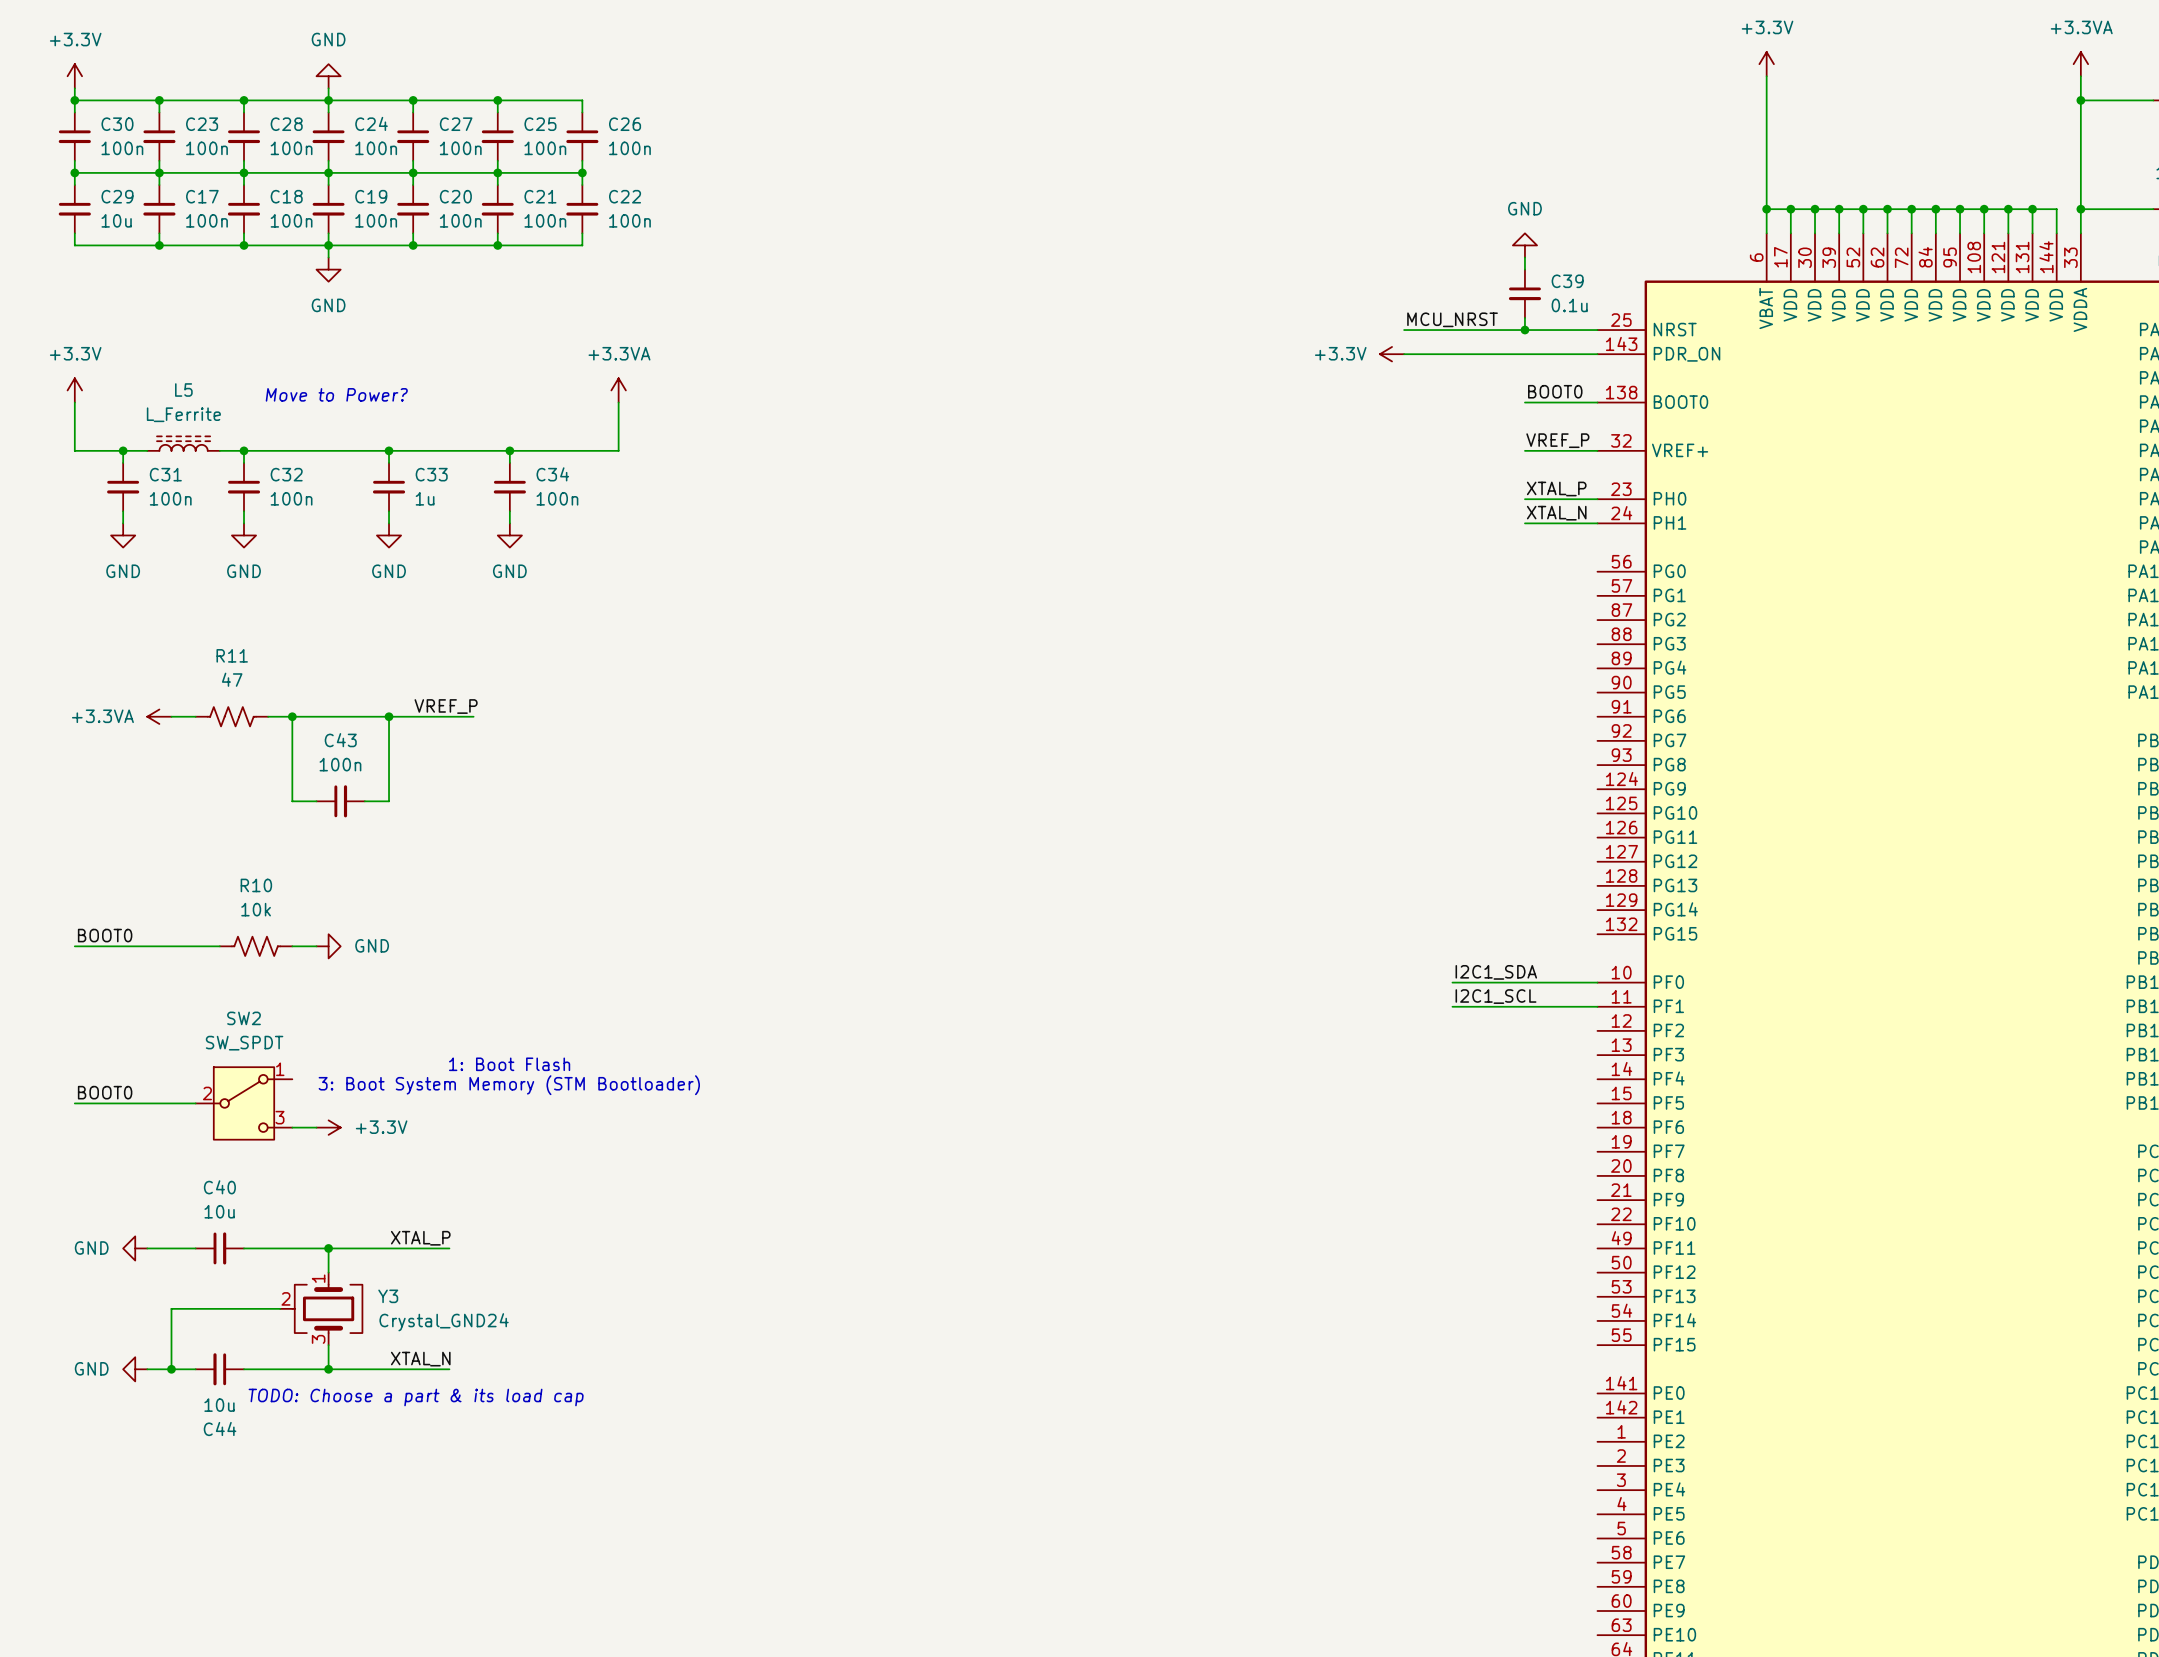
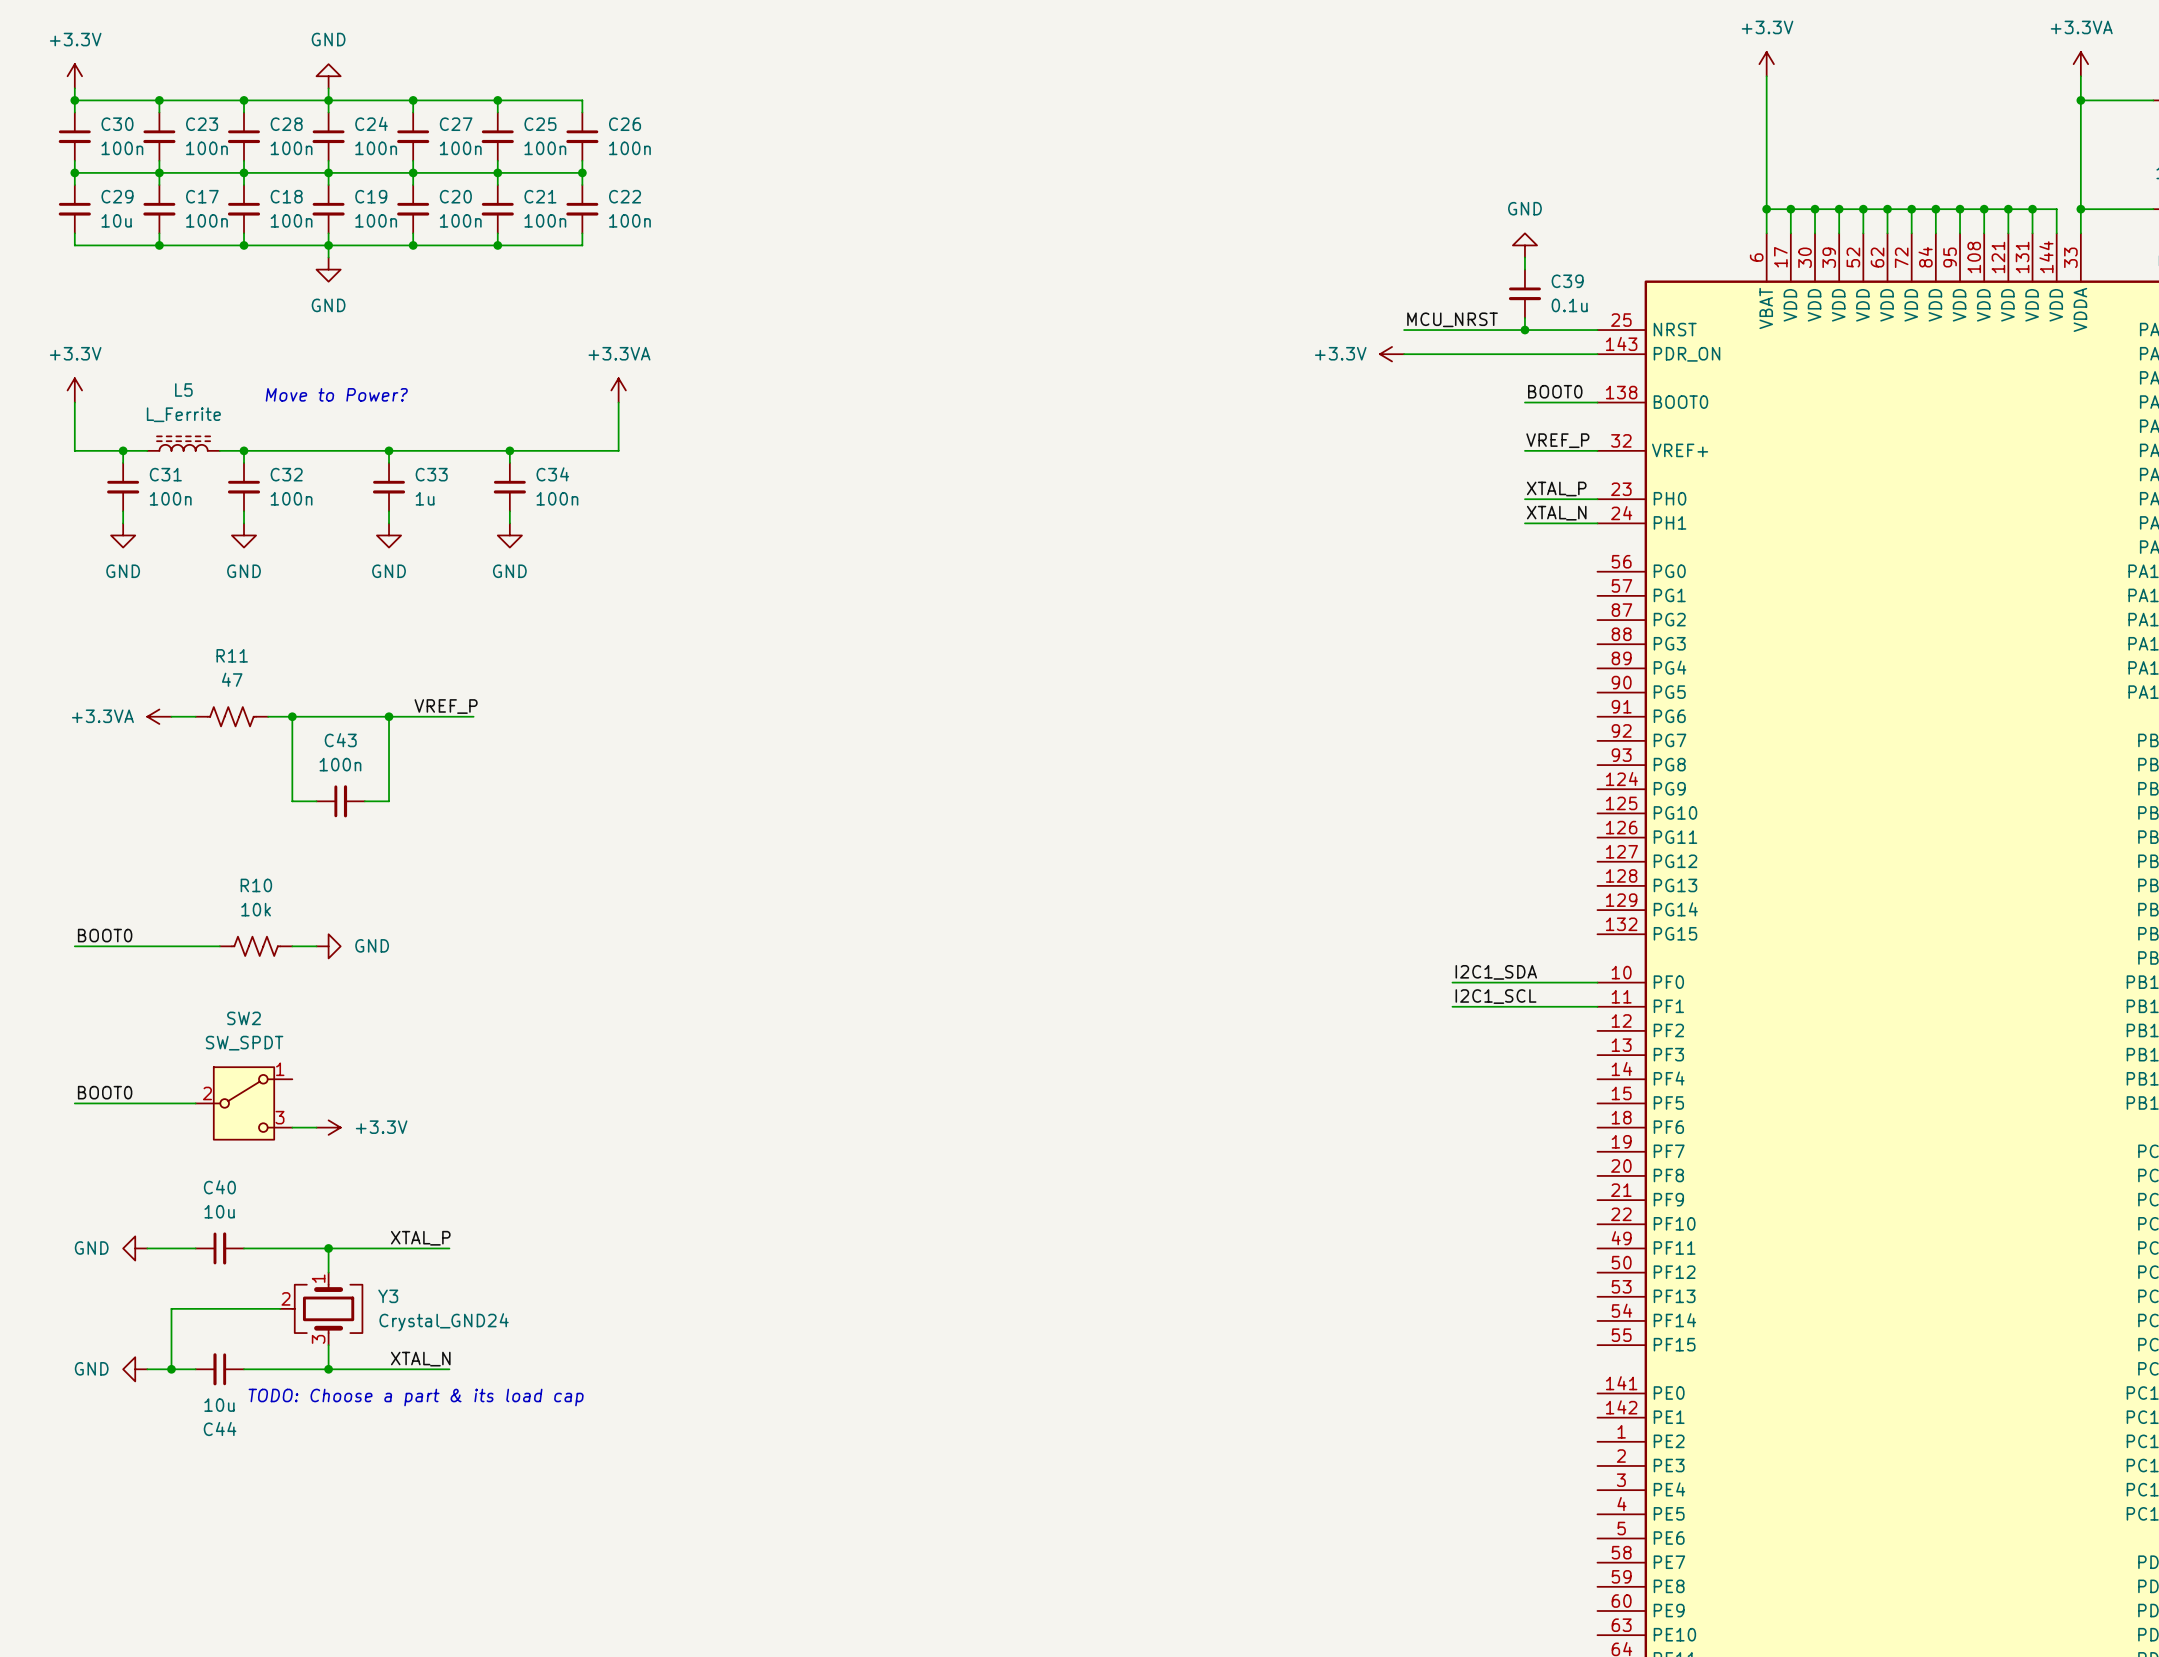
text: 1: Boot Flash (509, 1064) -> none
text: 3: Boot System Memory (STM Bootloader) (509, 1085) -> none

